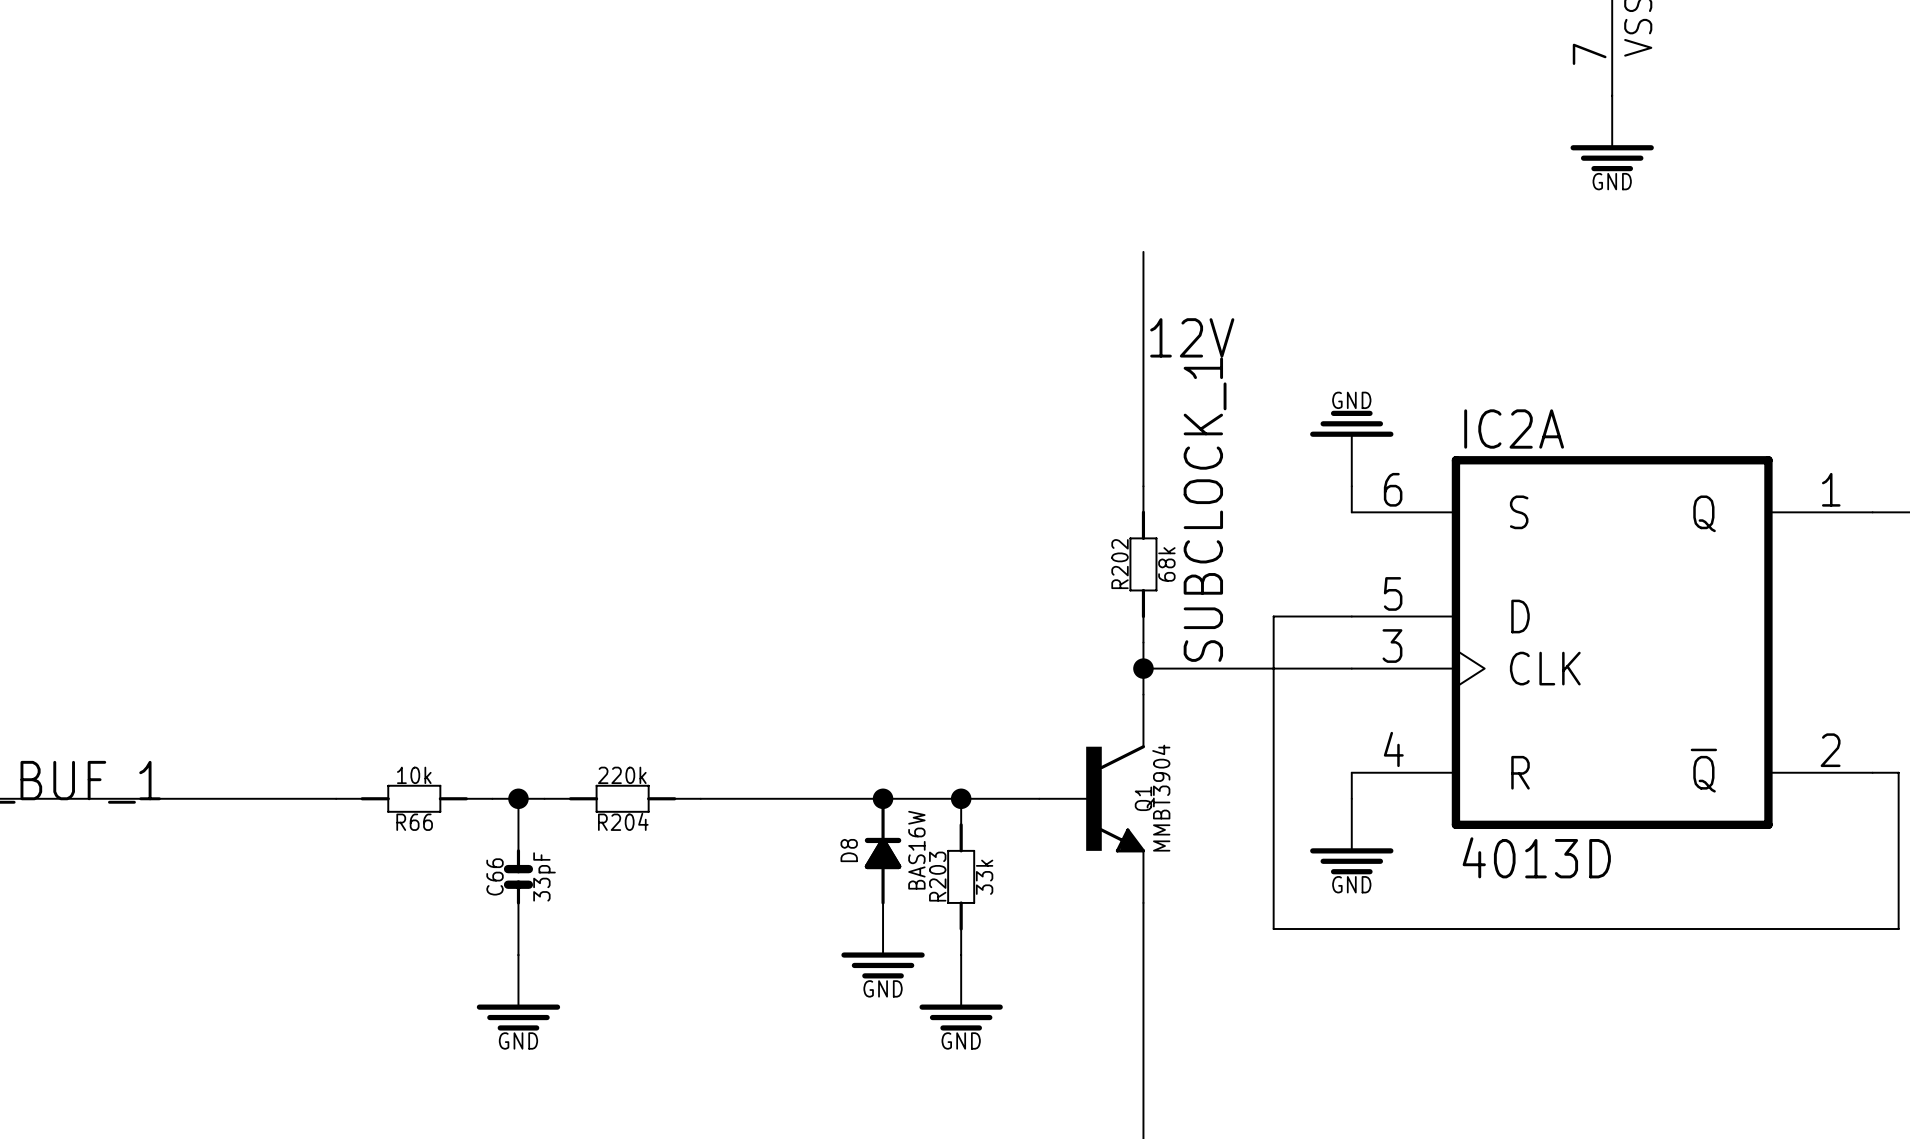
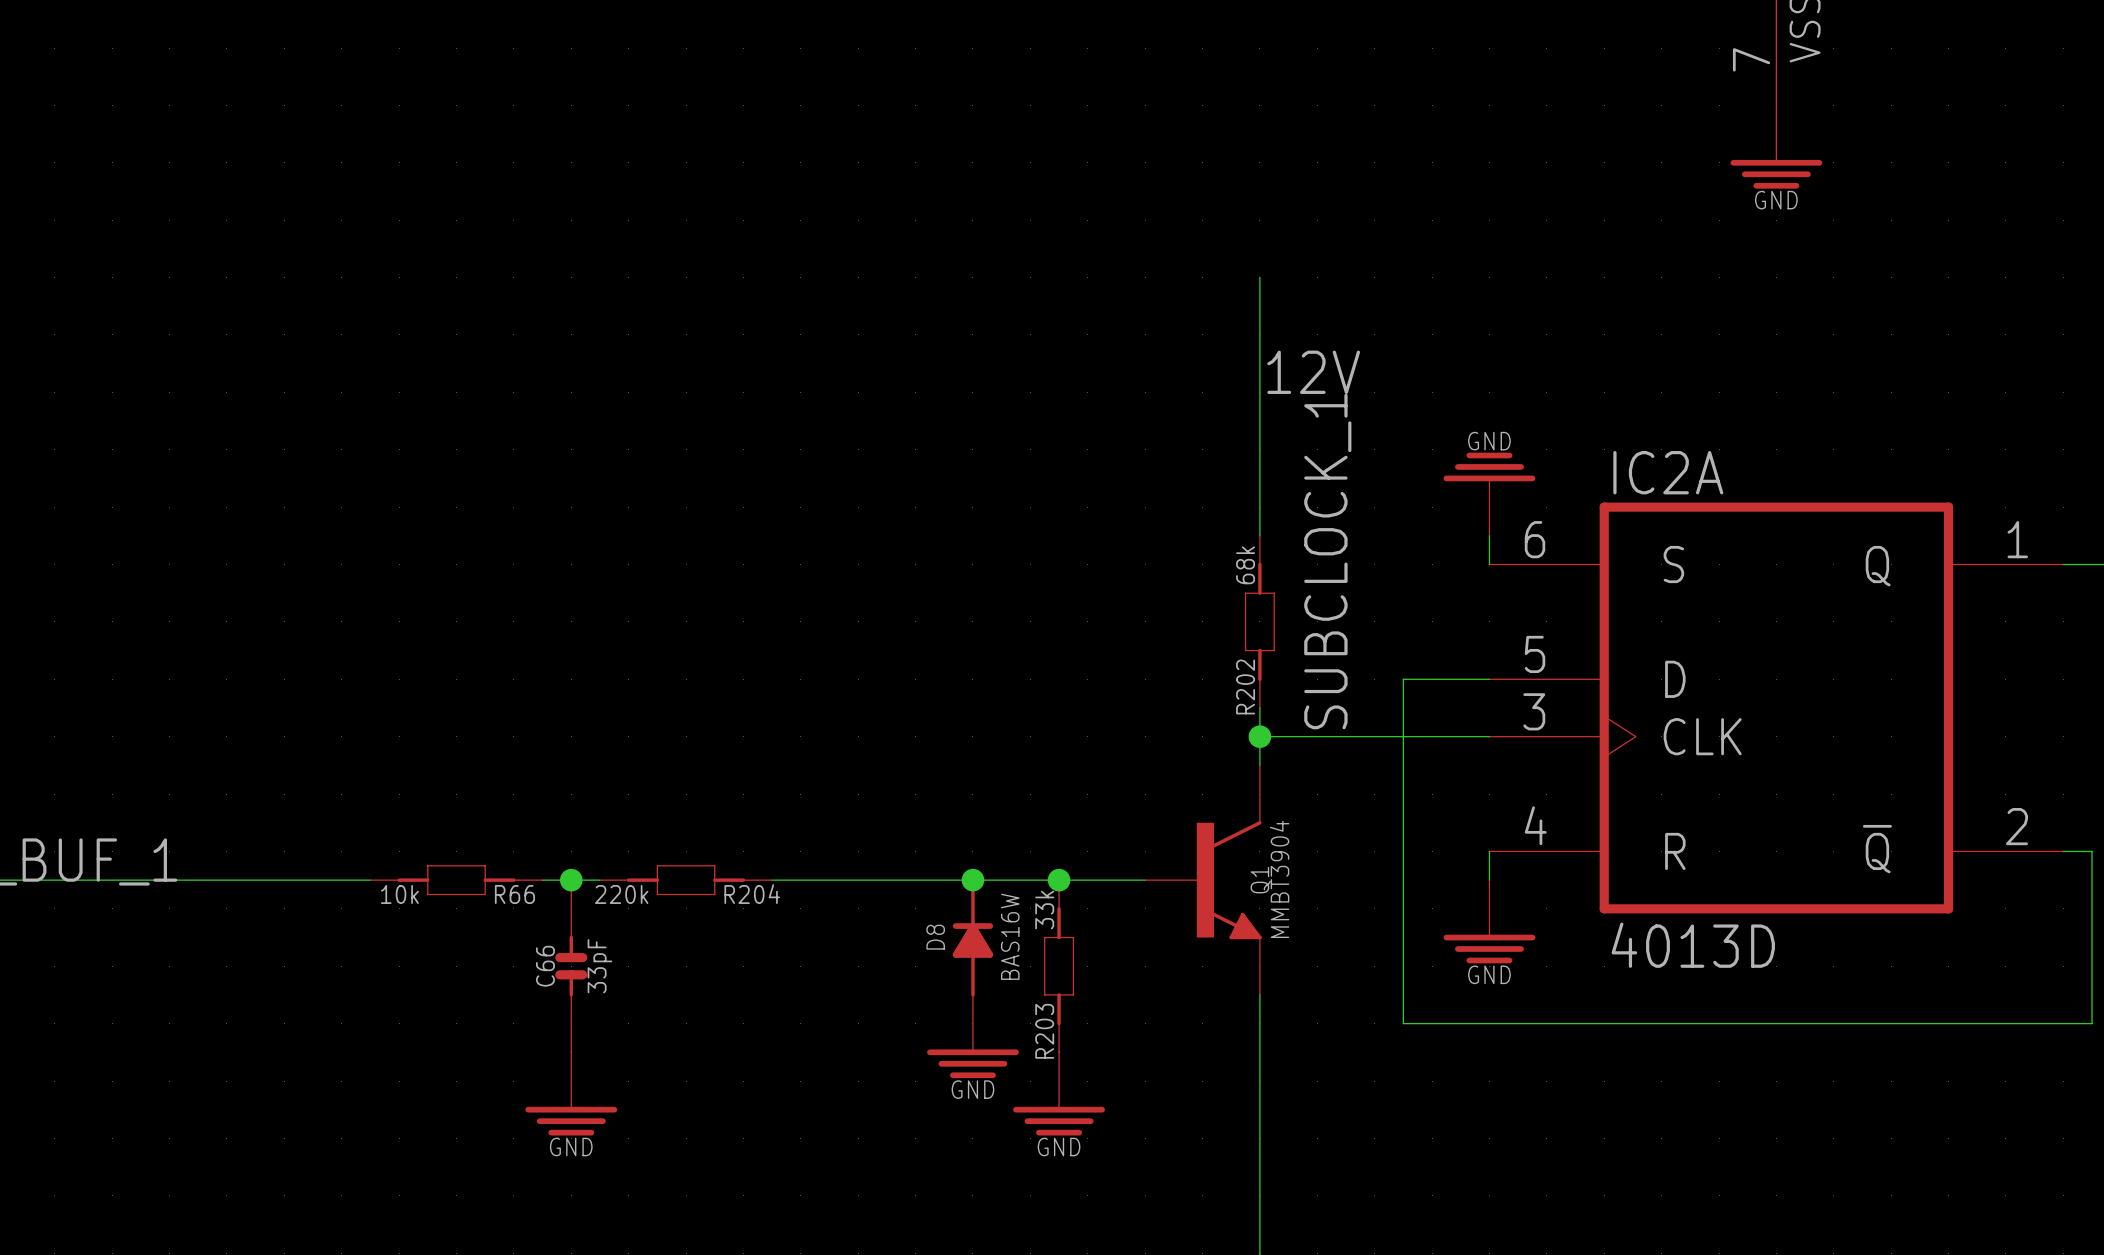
R202 name position: R202 (1120, 564) -> R202 (1245, 686)
R202 value position: 68k (1166, 564) -> 68k (1245, 565)
R66 value position: 10k (414, 775) -> 10k (399, 894)
R204 value position: 220k (622, 775) -> 220k (621, 894)
R204 name position: R204 (623, 821) -> R204 (752, 894)
R66 name position: R66 (414, 822) -> R66 (514, 894)
R203 name position: R203 (937, 876) -> R203 (1044, 1031)
R203 value position: 33k (984, 877) -> 33k (1044, 910)

